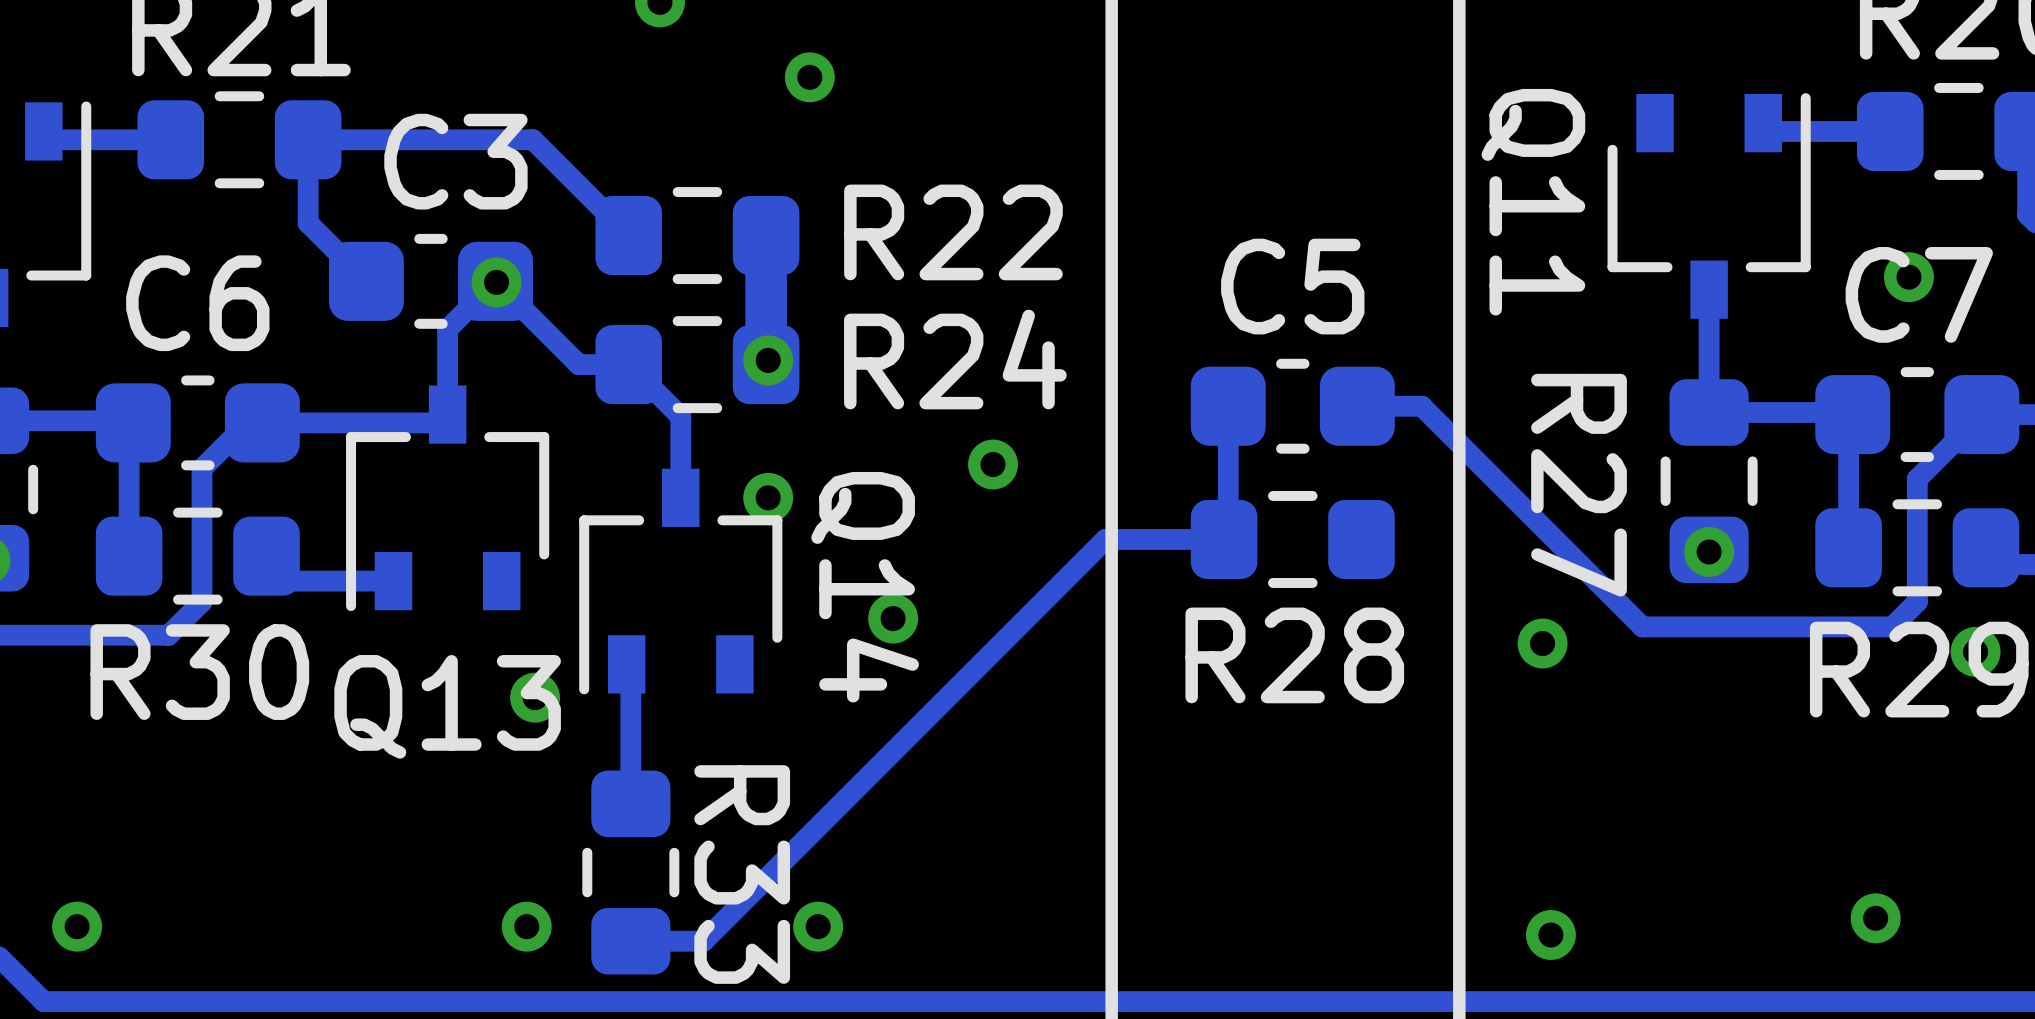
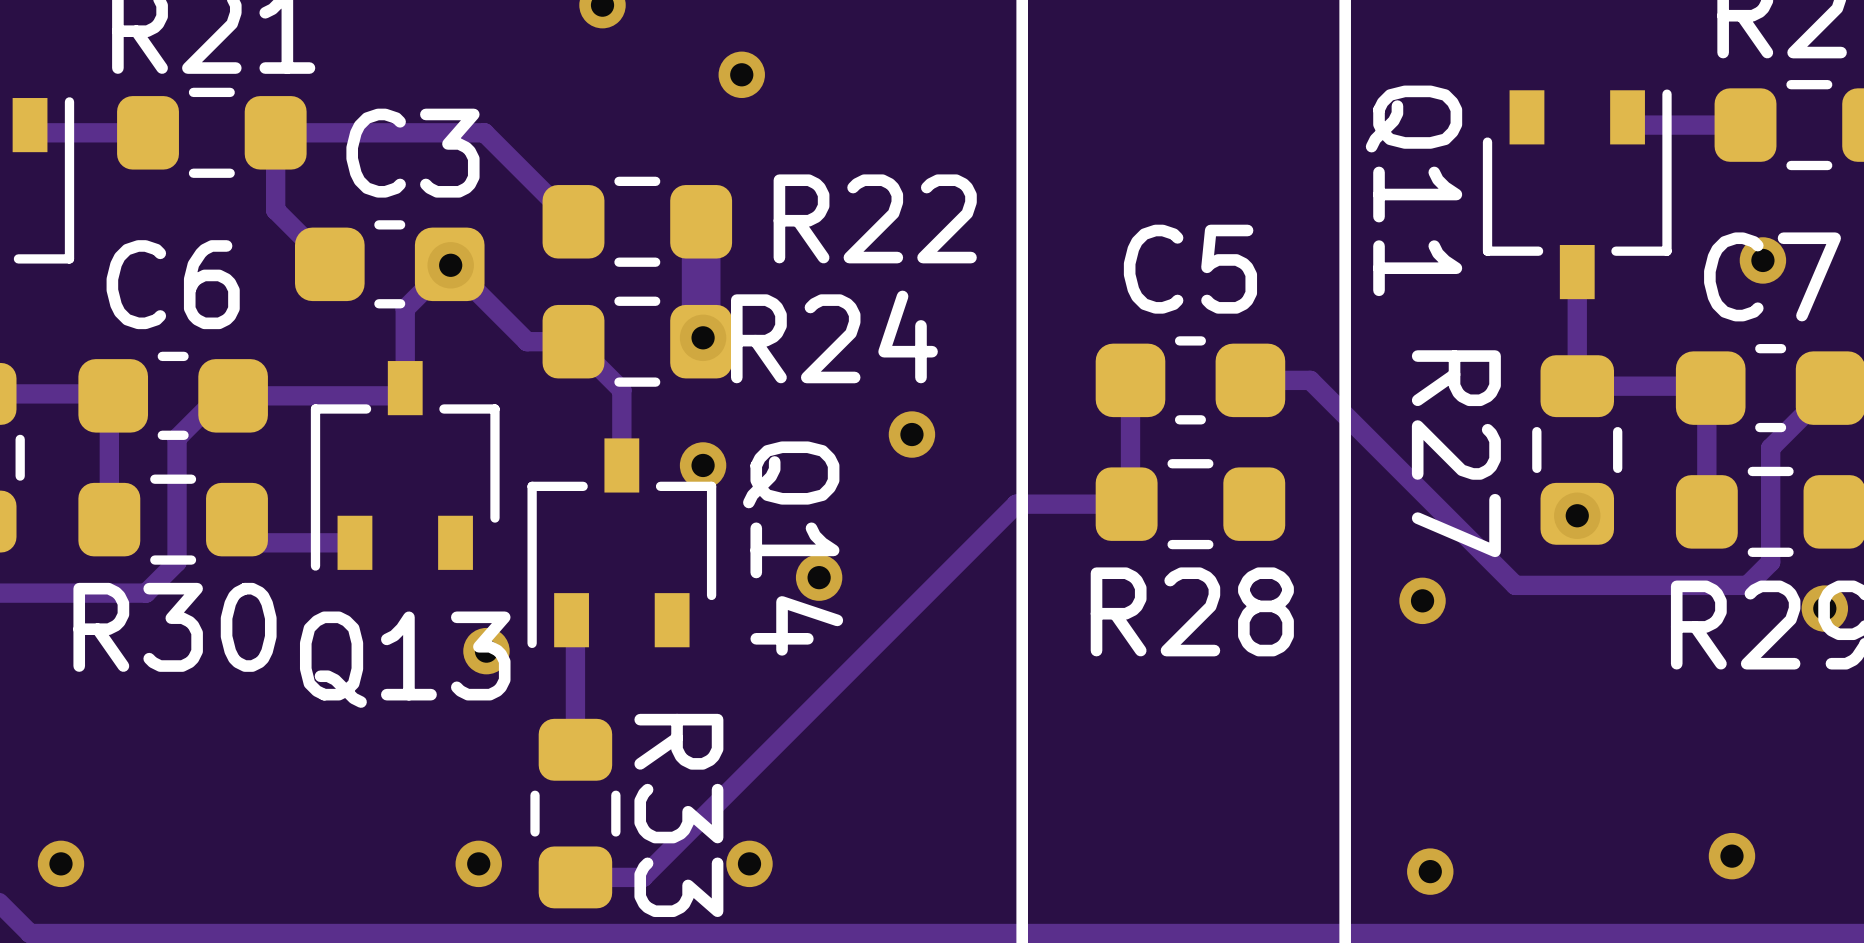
R24 name position: R24 (955, 359) -> R24 (834, 336)

